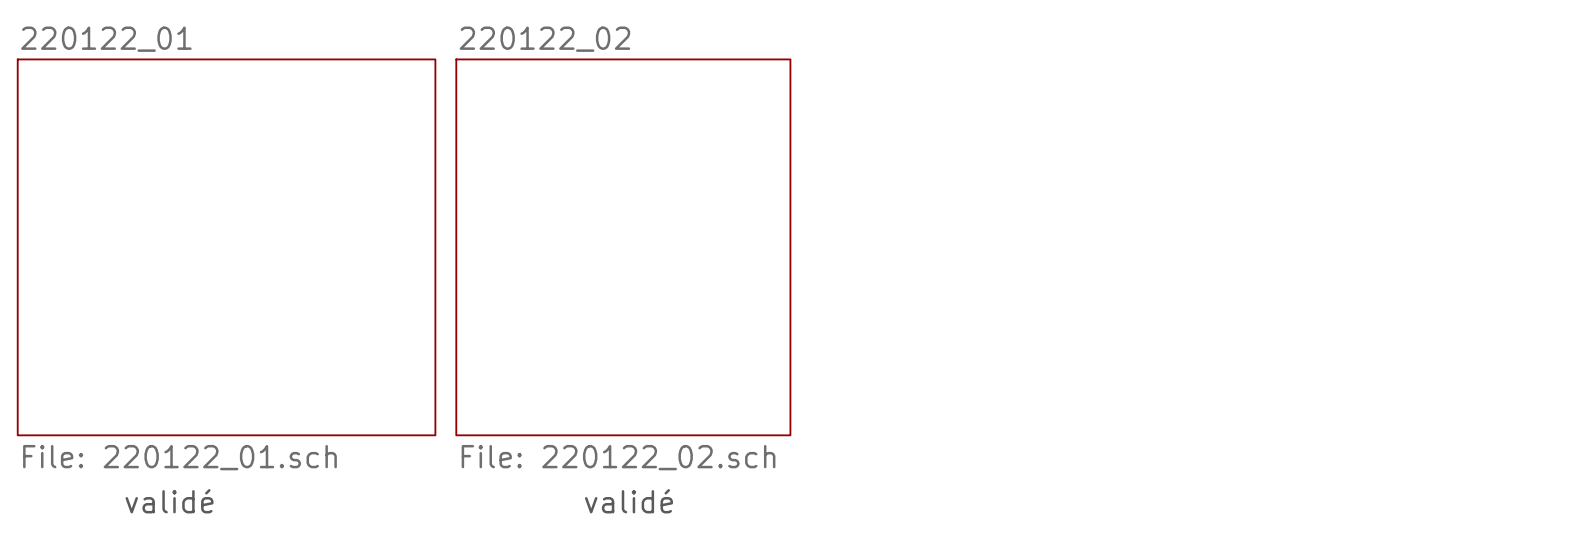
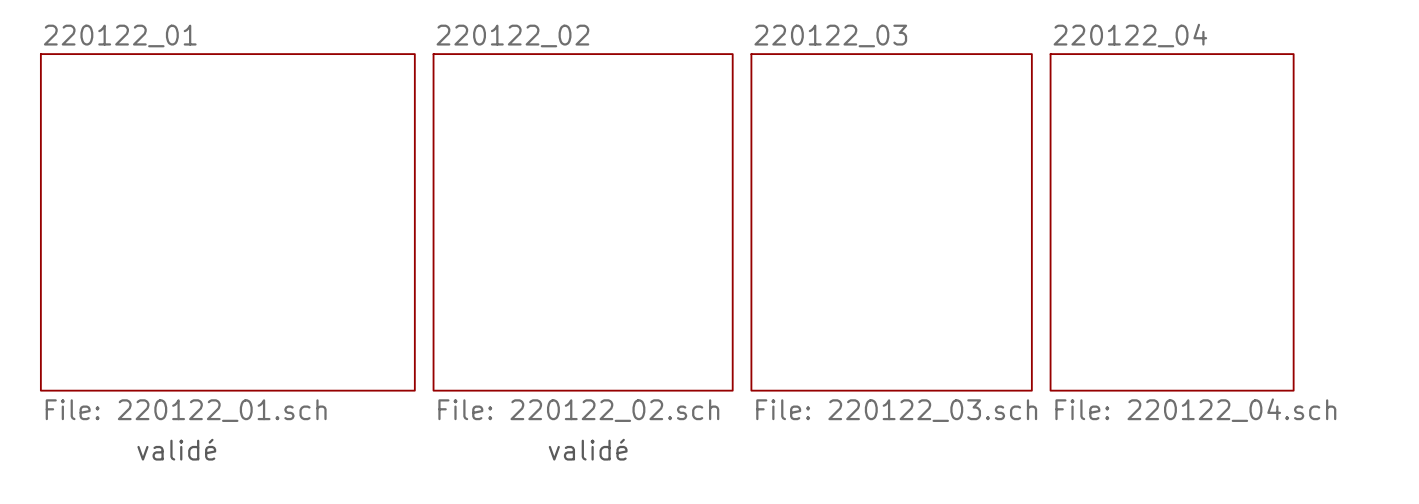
sheet 220122_03: none -> File: 220122_03.sch (891, 222)
sheet 220122_04: none -> File: 220122_04.sch (1172, 222)

